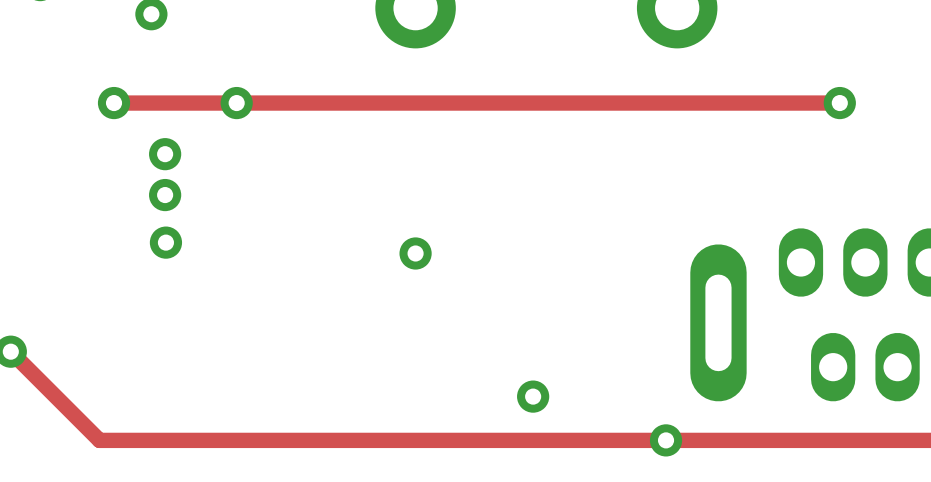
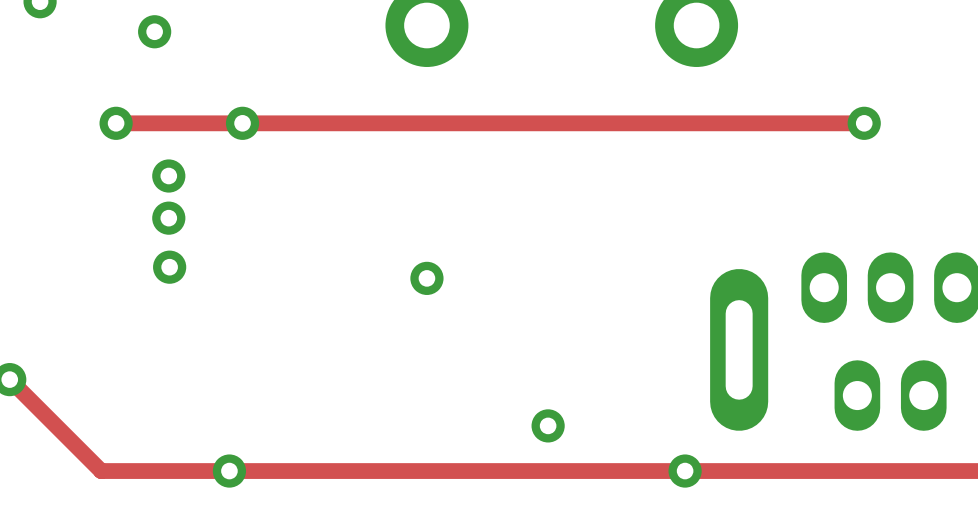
via: none -> (229, 471)

